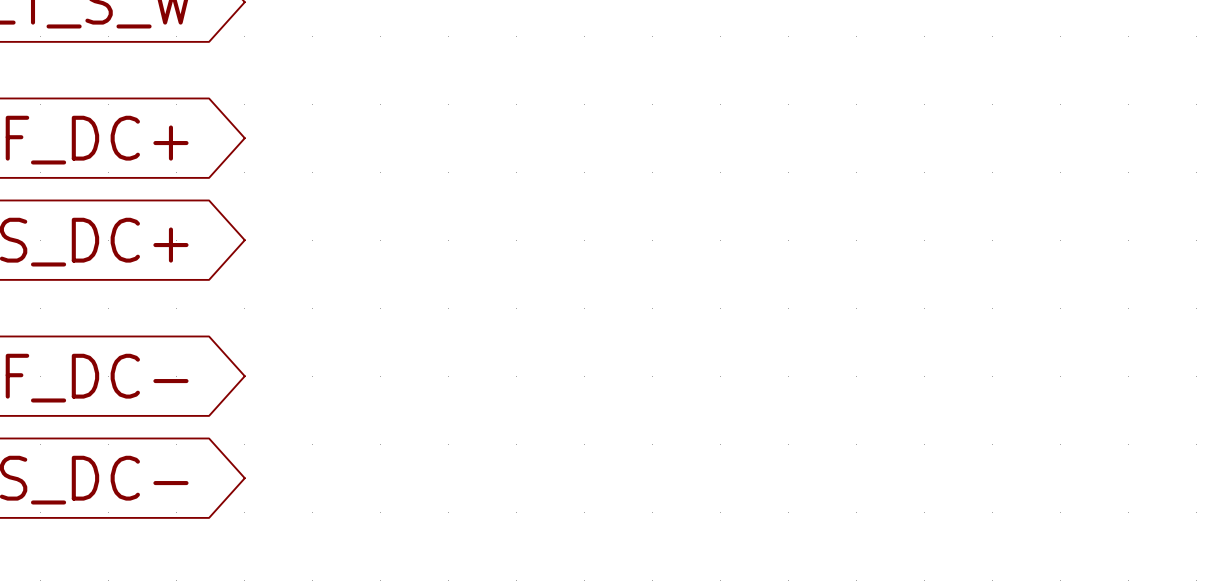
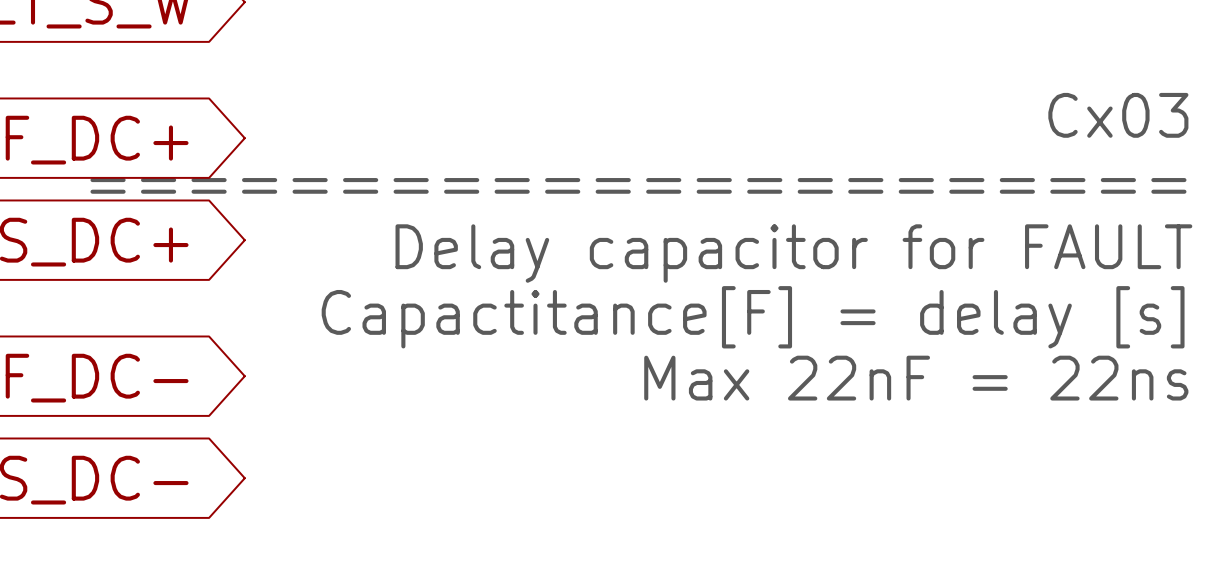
text: none -> Cx03 (1118, 115)
text: none -> ====================== (638, 185)
text: none -> Delay capacitor for FAULT (793, 253)
text: none -> Capactitance[F] = delay [s] (753, 317)
text: none -> Max 22nF = 22ns (916, 378)

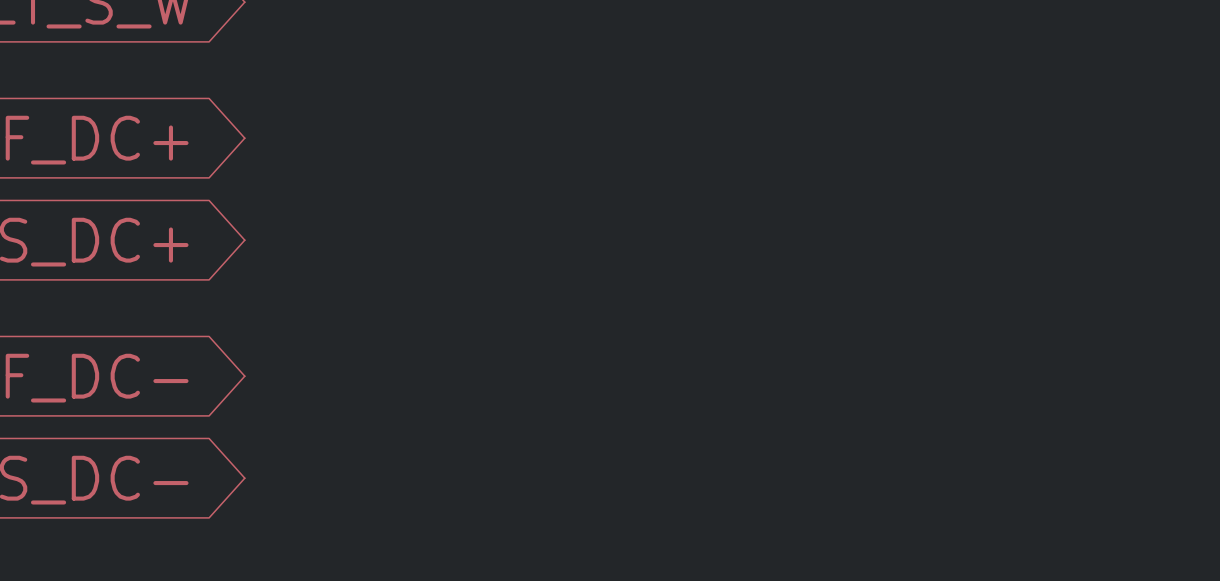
text: Cx03 (1118, 115) -> none
text: ====================== (638, 185) -> none
text: Delay capacitor for FAULT (793, 253) -> none
text: Capactitance[F] = delay [s] (753, 317) -> none
text: Max 22nF = 22ns (916, 378) -> none

